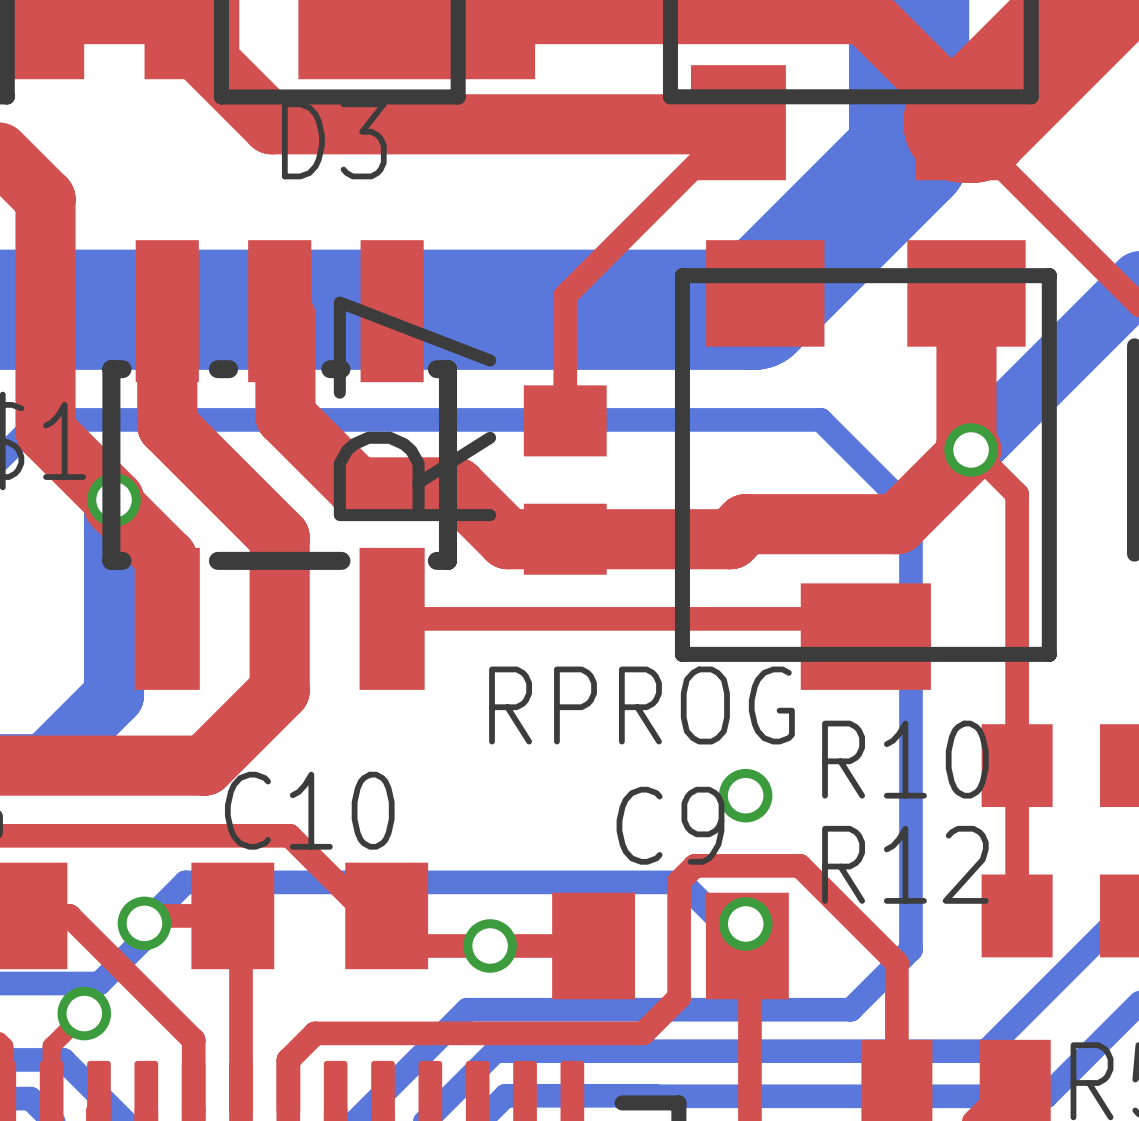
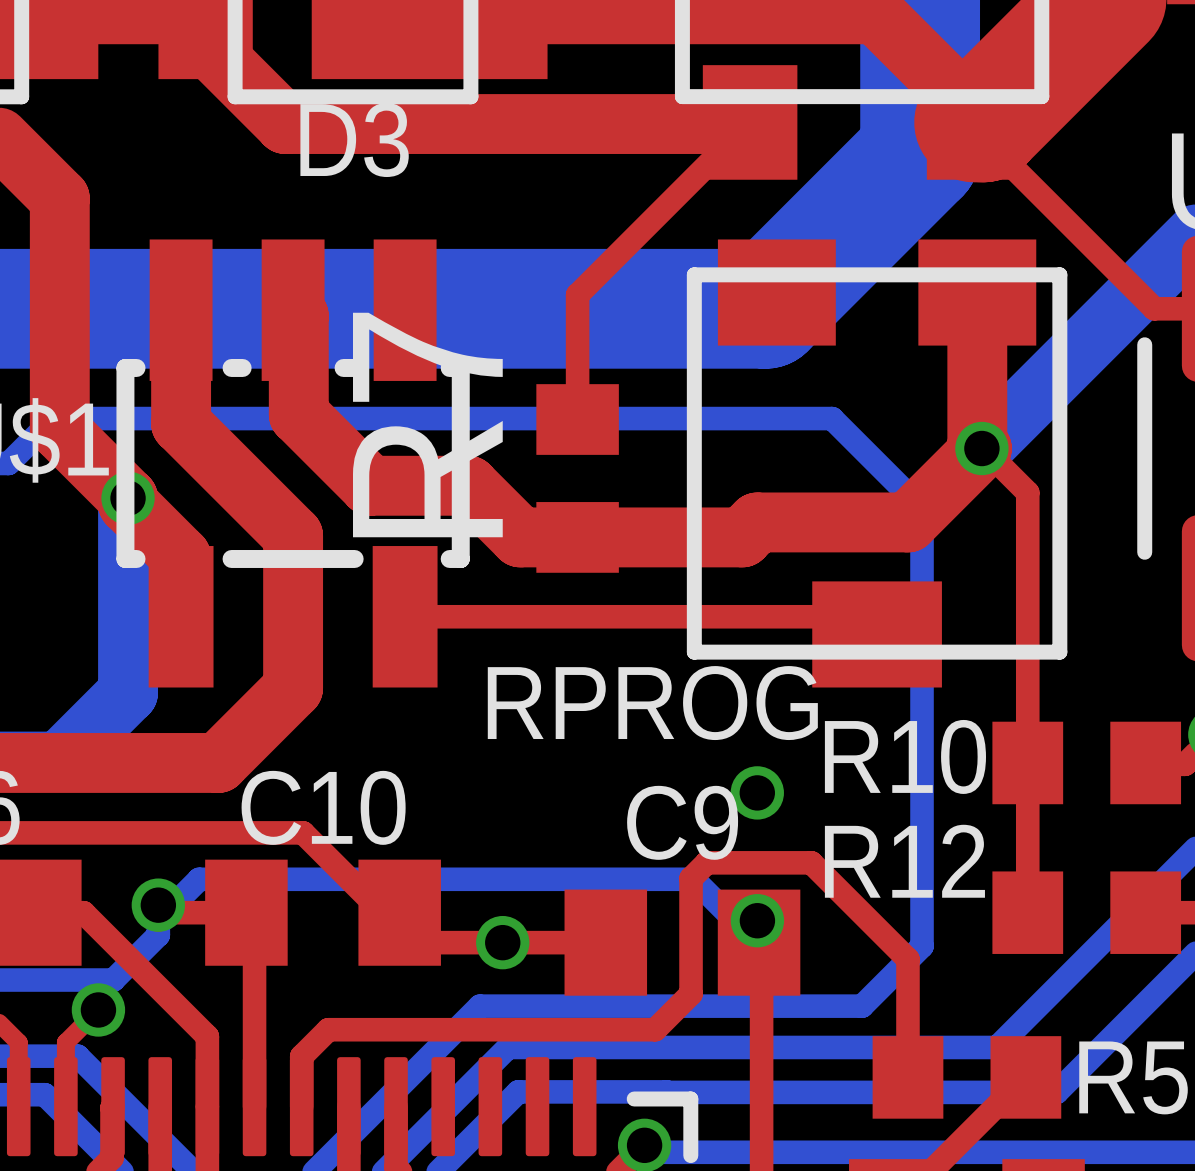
via position: (144, 923) -> (158, 905)

